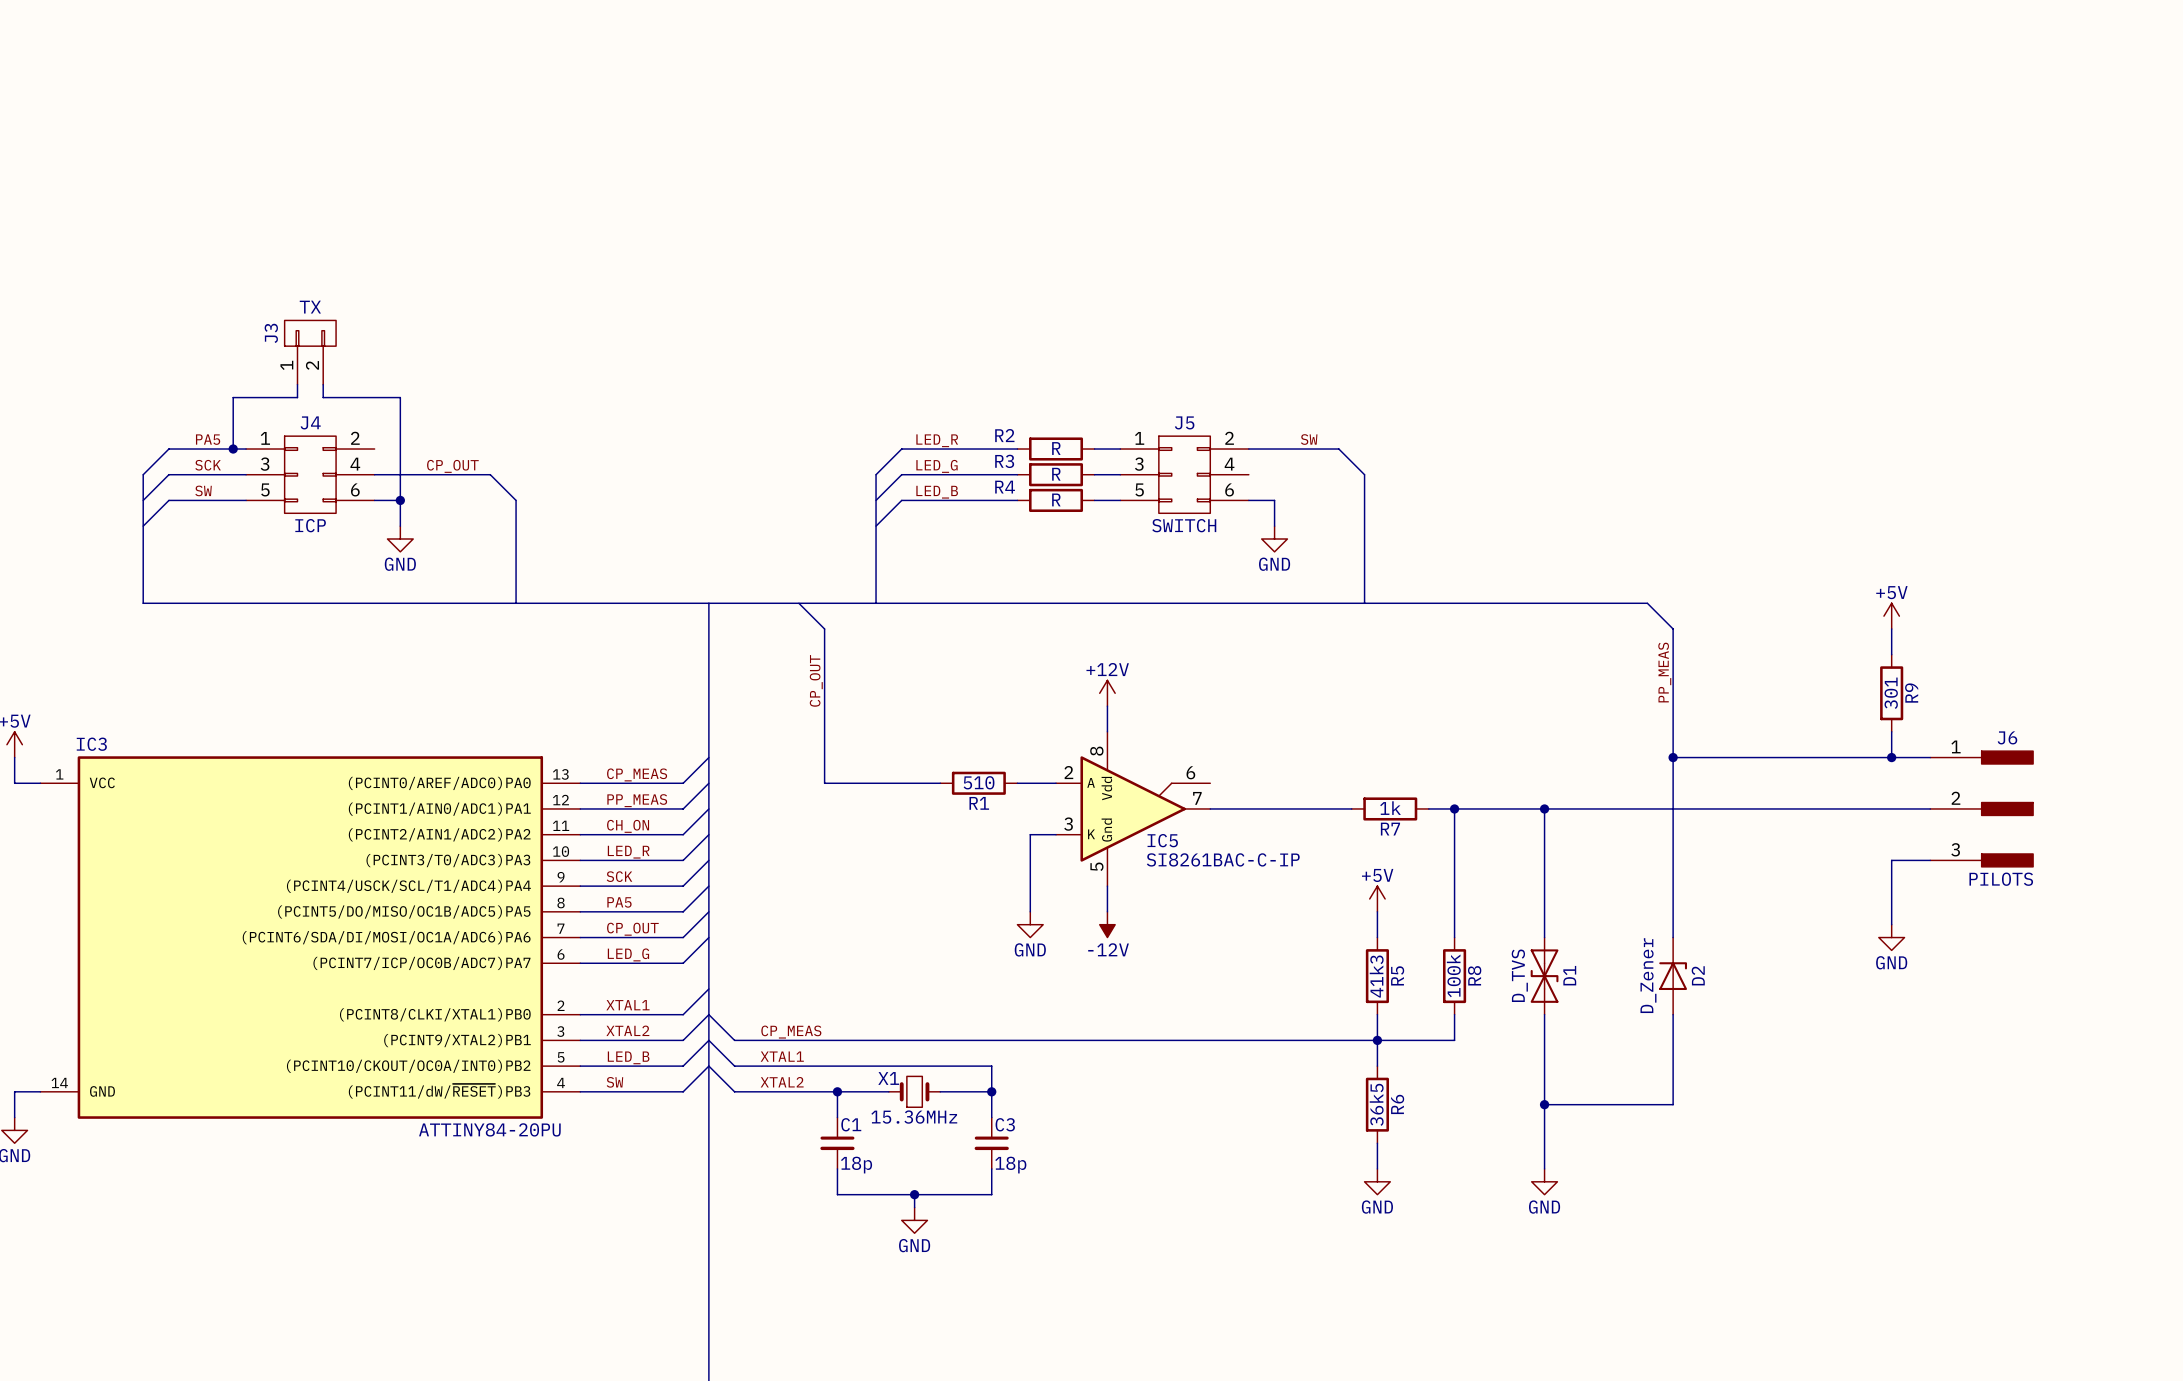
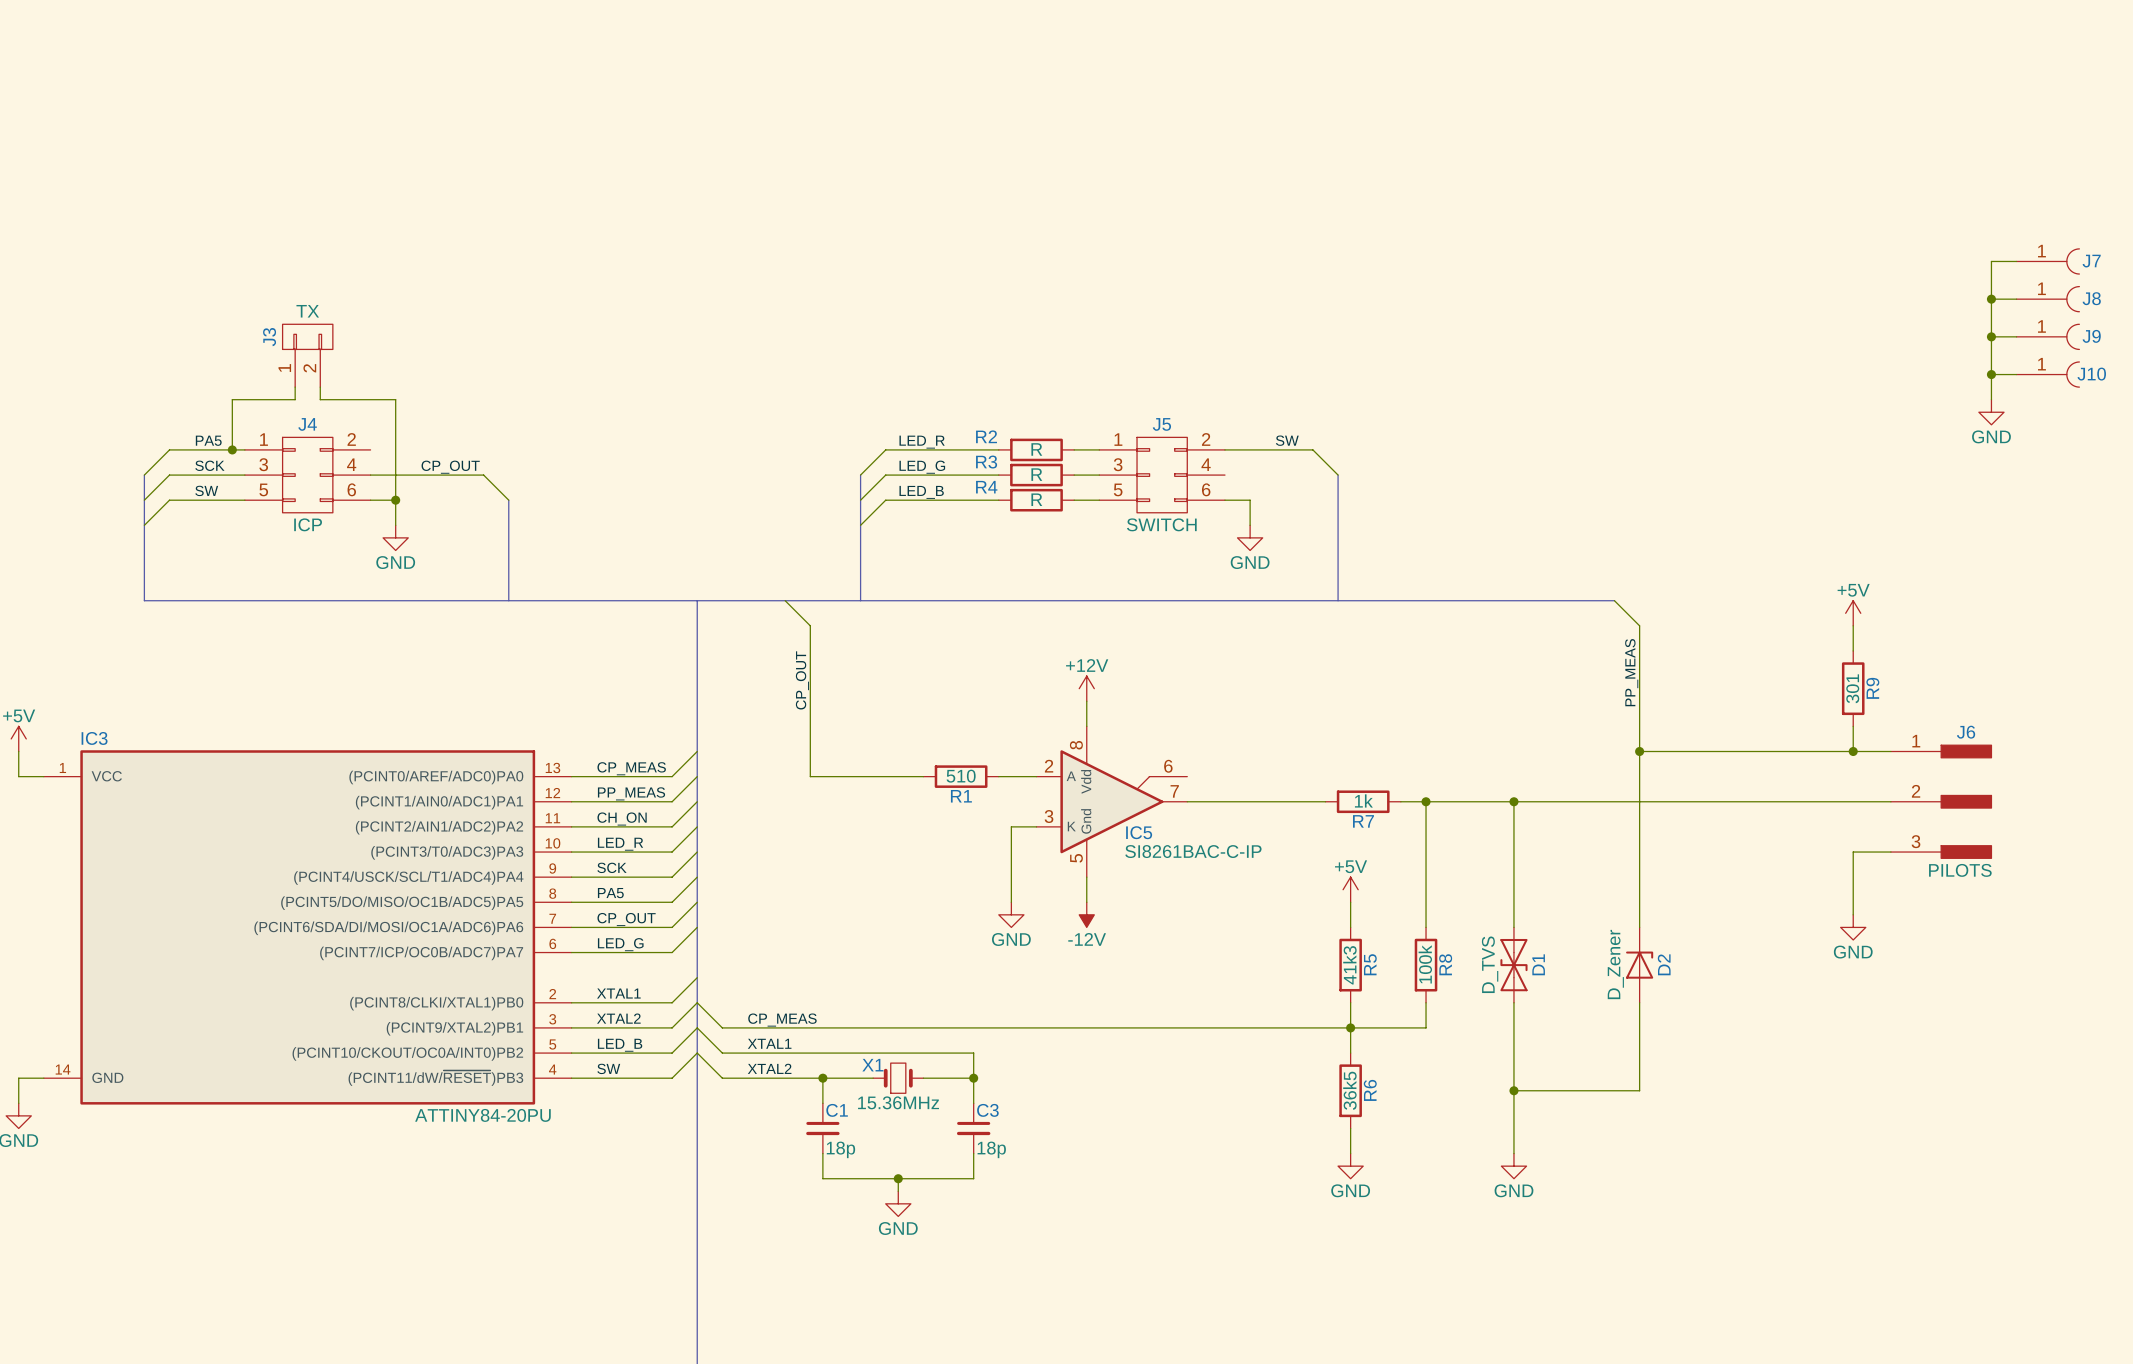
wire: none -> (2016, 261) (1991, 261) (1991, 399)
J7: none -> (2047, 261)
wire: none -> (1991, 299) (2016, 299)
junction: none -> (1991, 299)
J8: none -> (2047, 299)
wire: none -> (1991, 336) (2016, 336)
junction: none -> (1991, 336)
J9: none -> (2047, 336)
wire: none -> (1991, 374) (2016, 374)
junction: none -> (1991, 374)
J10: none -> (2047, 374)
power symbol: none -> GND (1991, 412)

